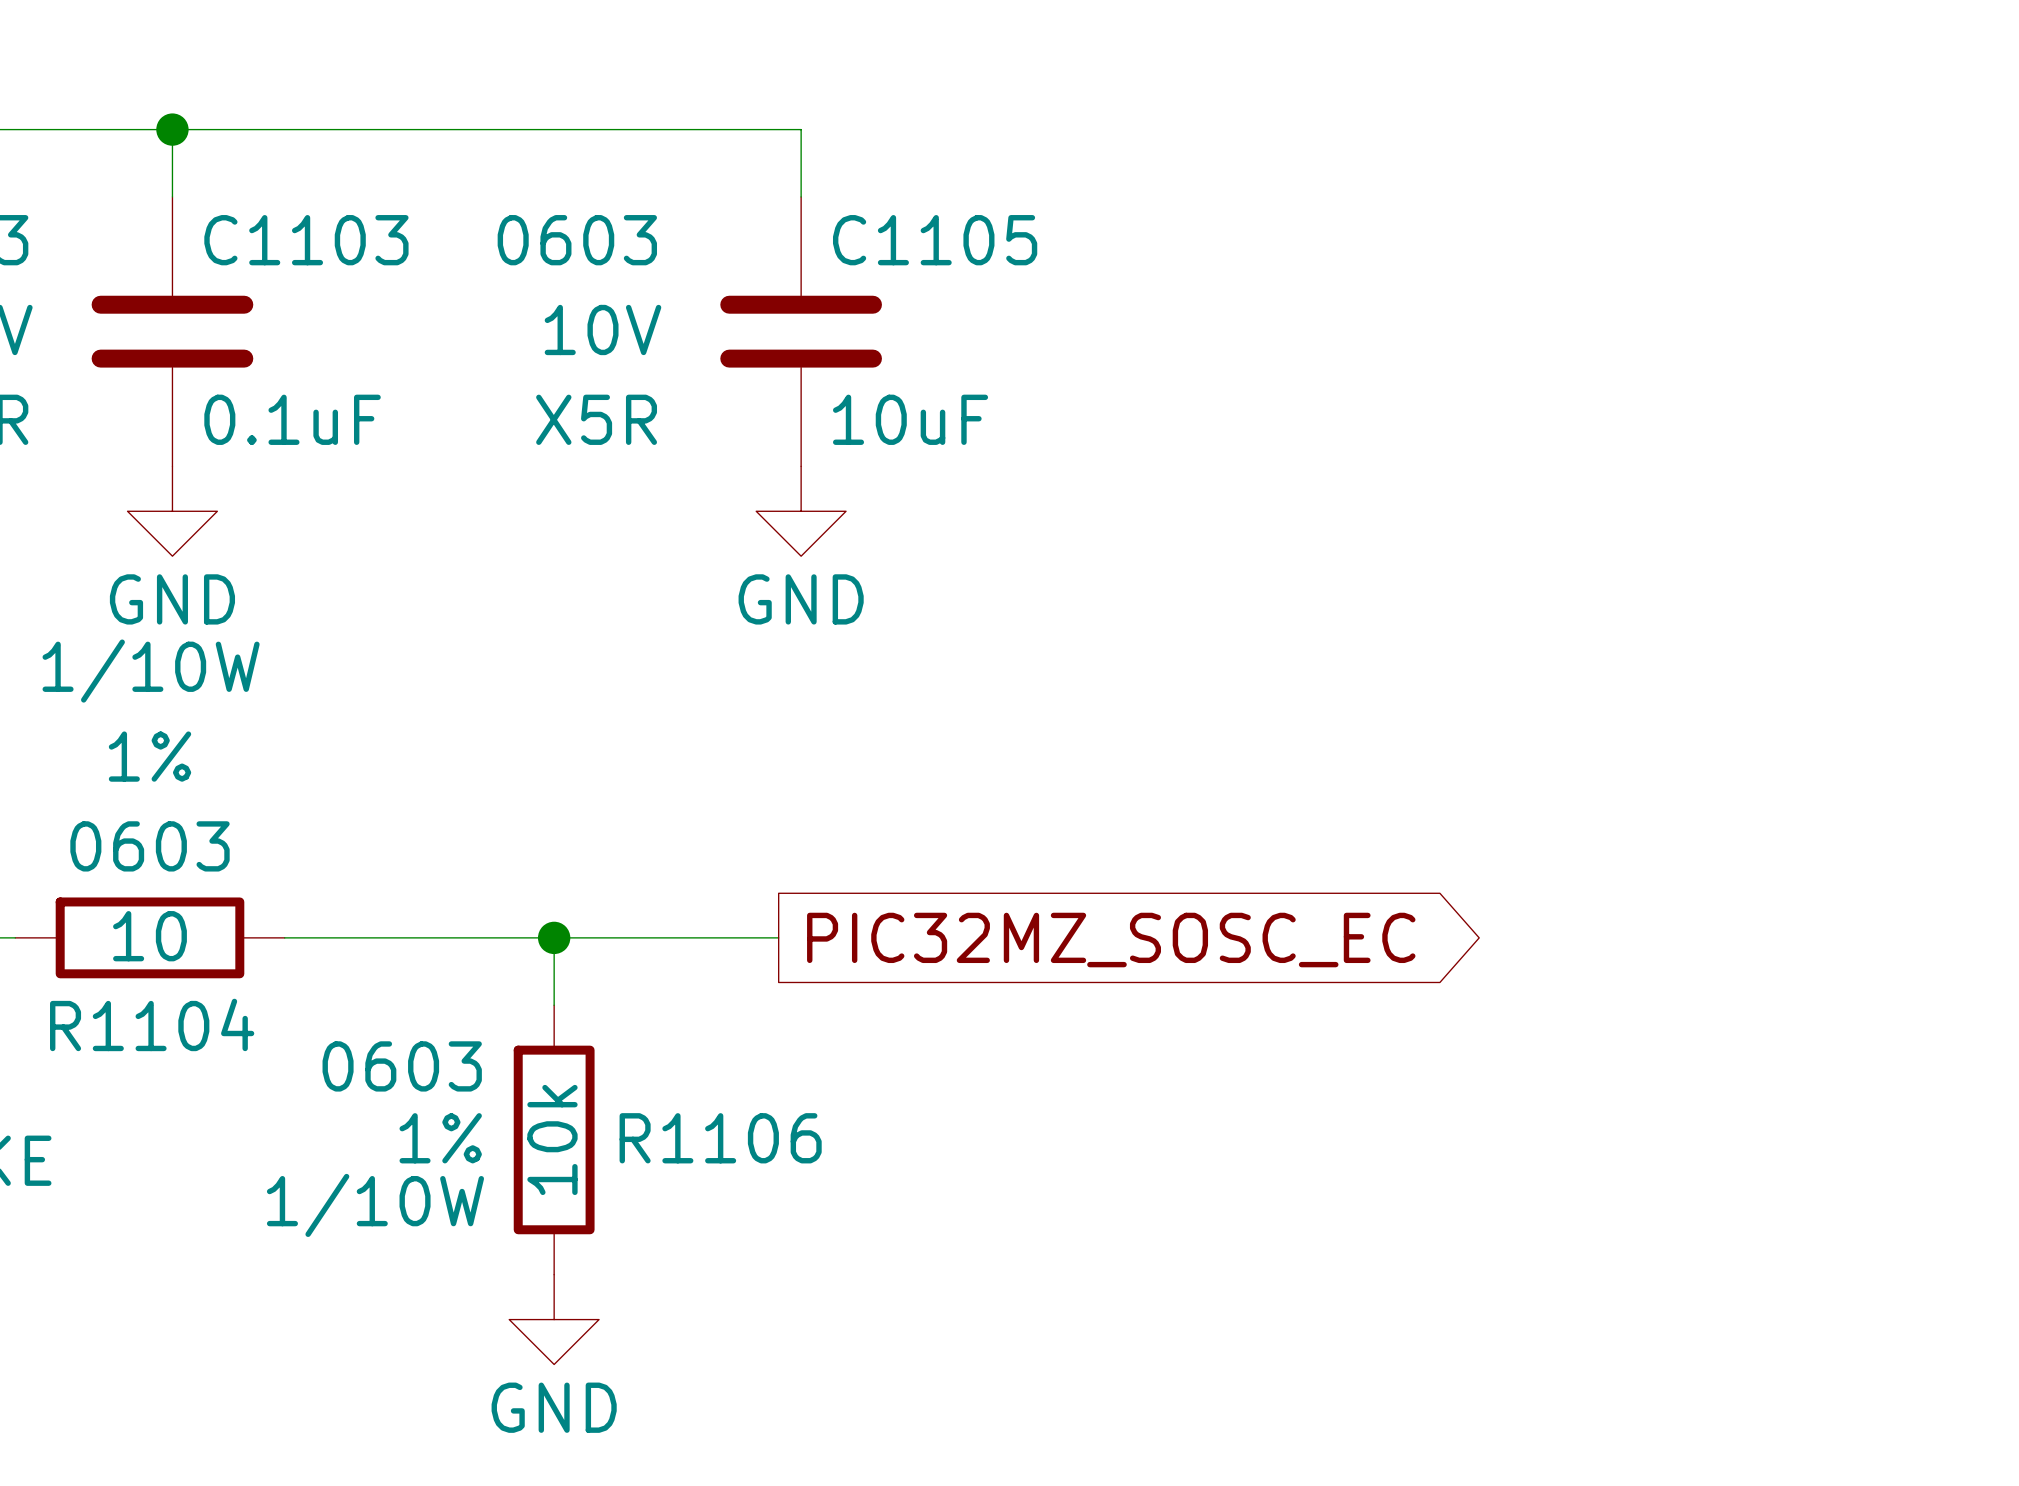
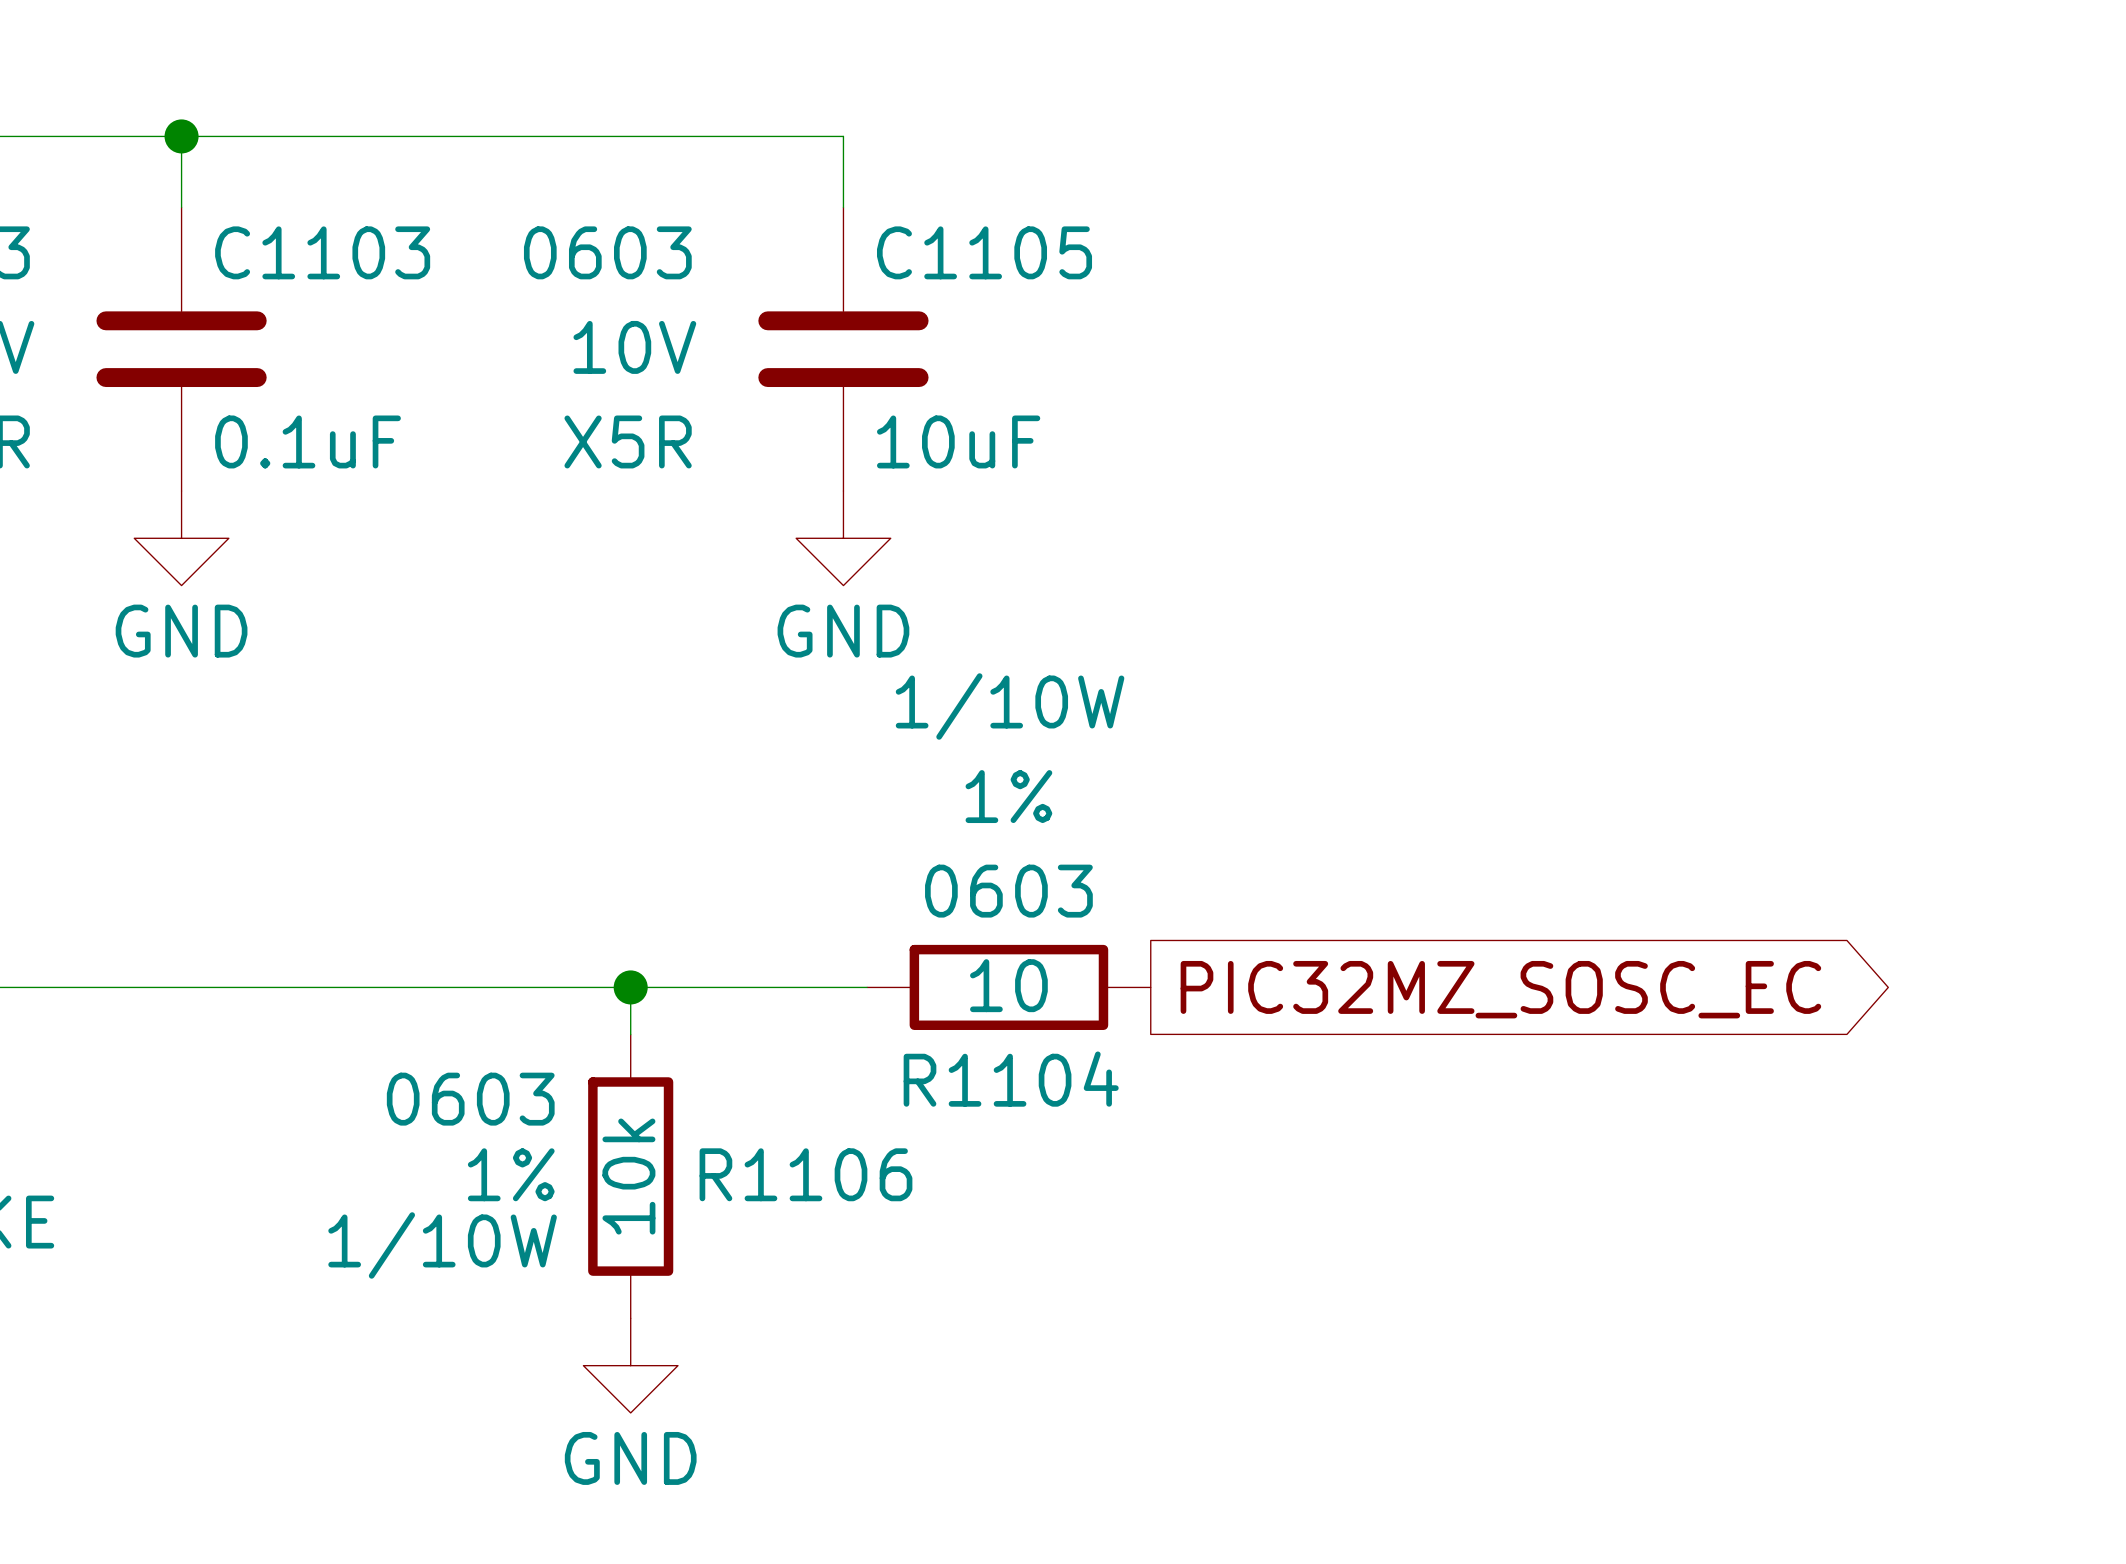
wire: none -> (16, 987) (299, 987)
R1104 position: (150, 937) -> (1008, 987)
wire: (554, 937) (554, 1005) -> none
junction position: (554, 937) -> (630, 987)
wire: none -> (630, 987) (630, 1034)
wire: none -> (819, 987) (867, 987)
global label position: PIC32MZ_SOSC_EC (1111, 940) -> PIC32MZ_SOSC_EC (1500, 989)
R1106 position: (554, 1139) -> (630, 1176)
power symbol position: GND (554, 1319) -> GND (630, 1365)

